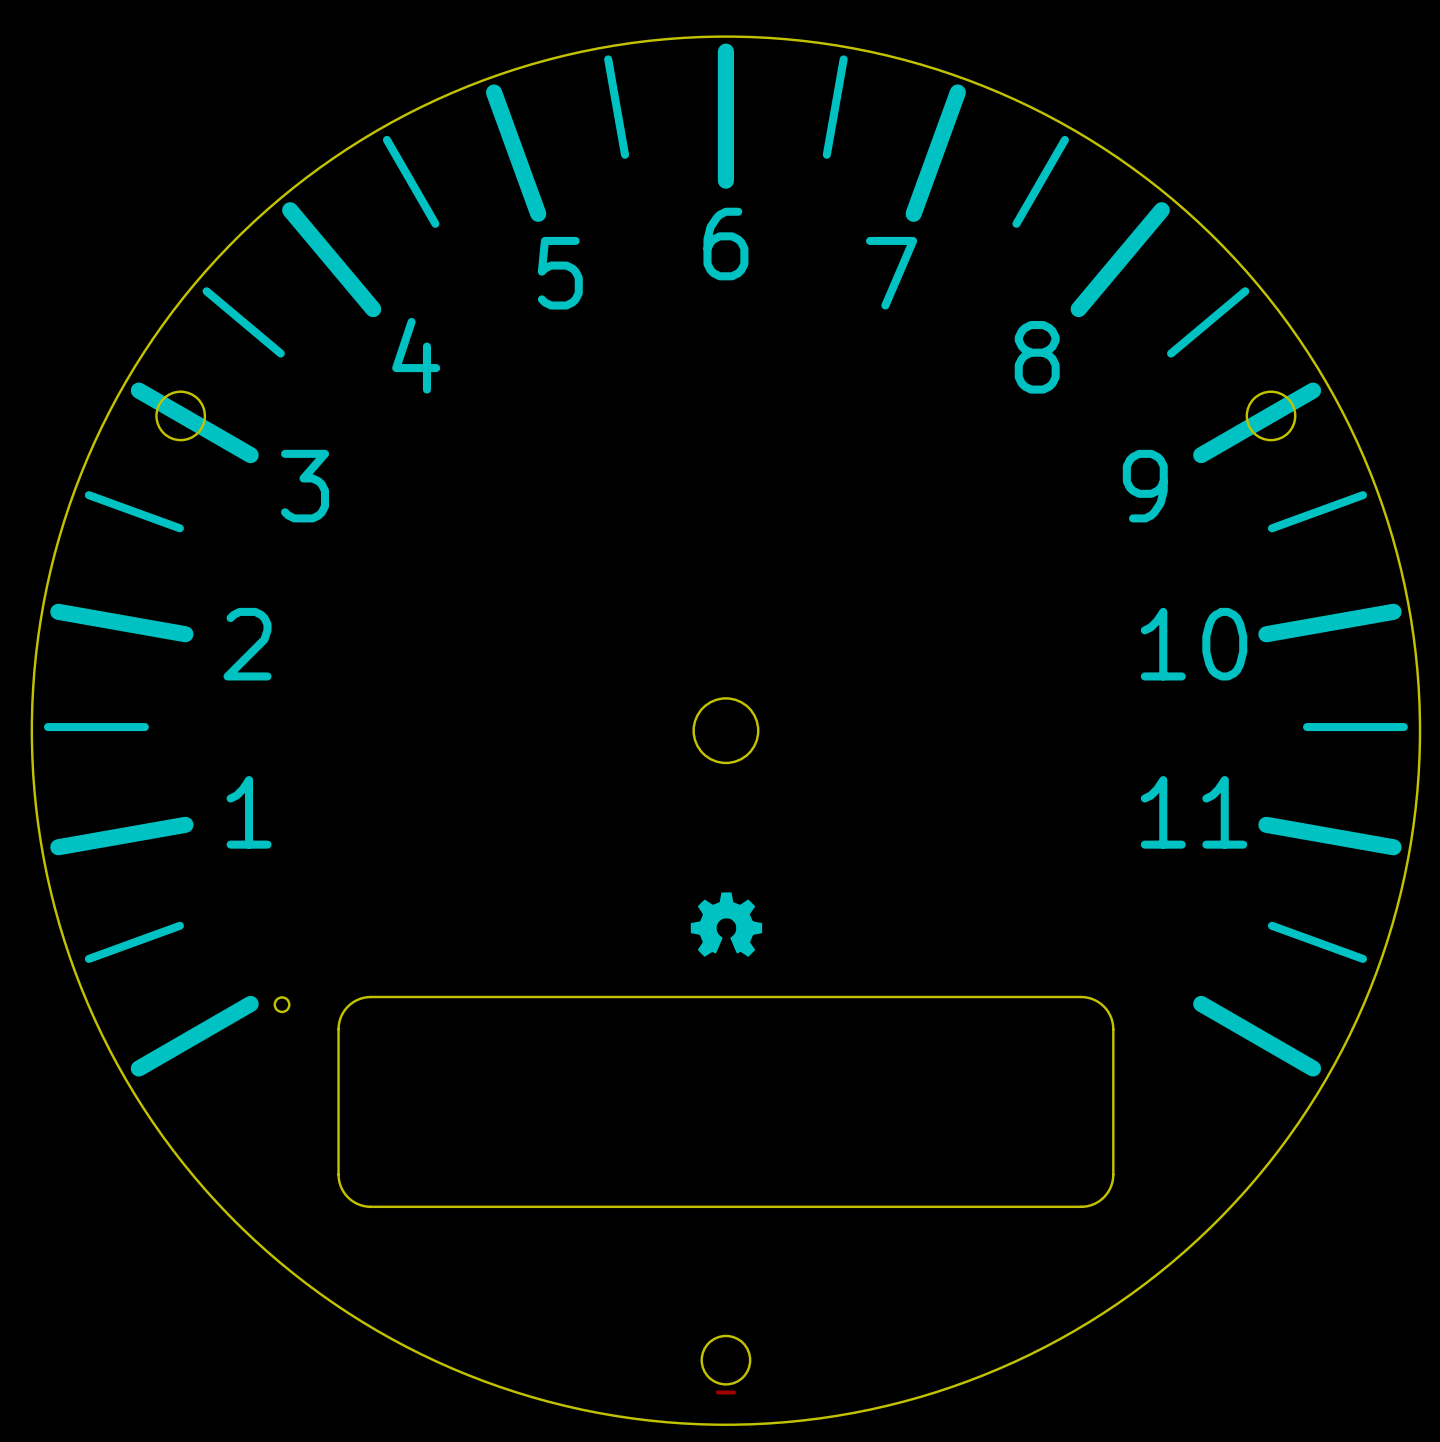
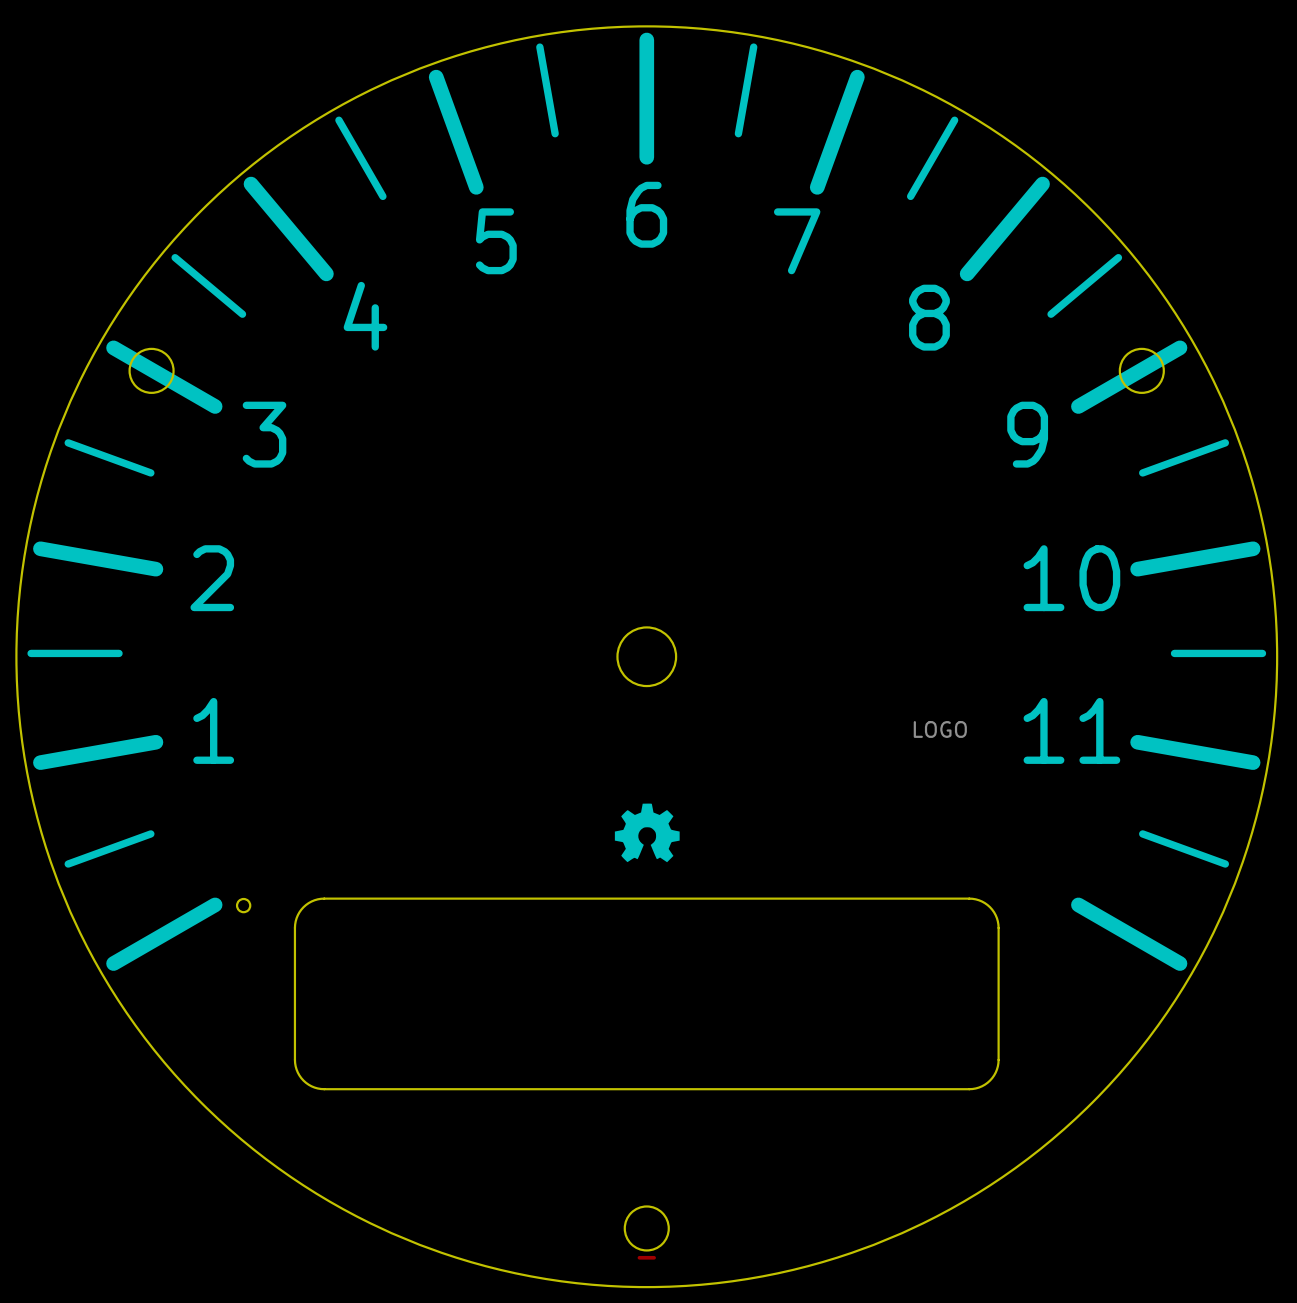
drawing: none -> [913, 721, 967, 738]

